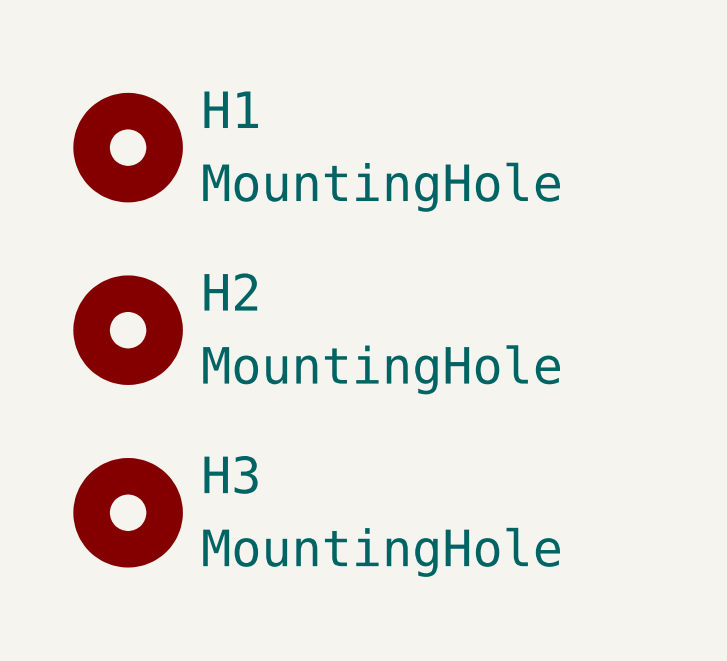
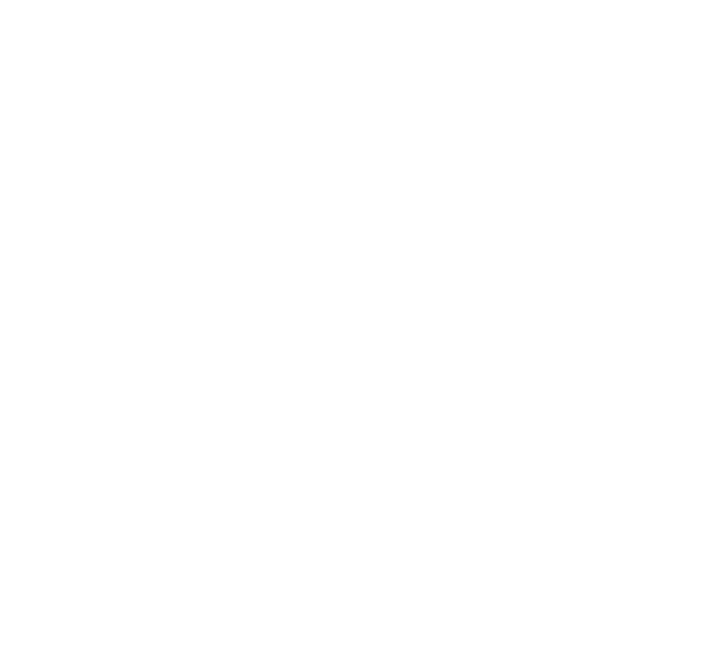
H1: MountingHole (128, 147) -> none
H2: MountingHole (128, 330) -> none
H3: MountingHole (128, 512) -> none

